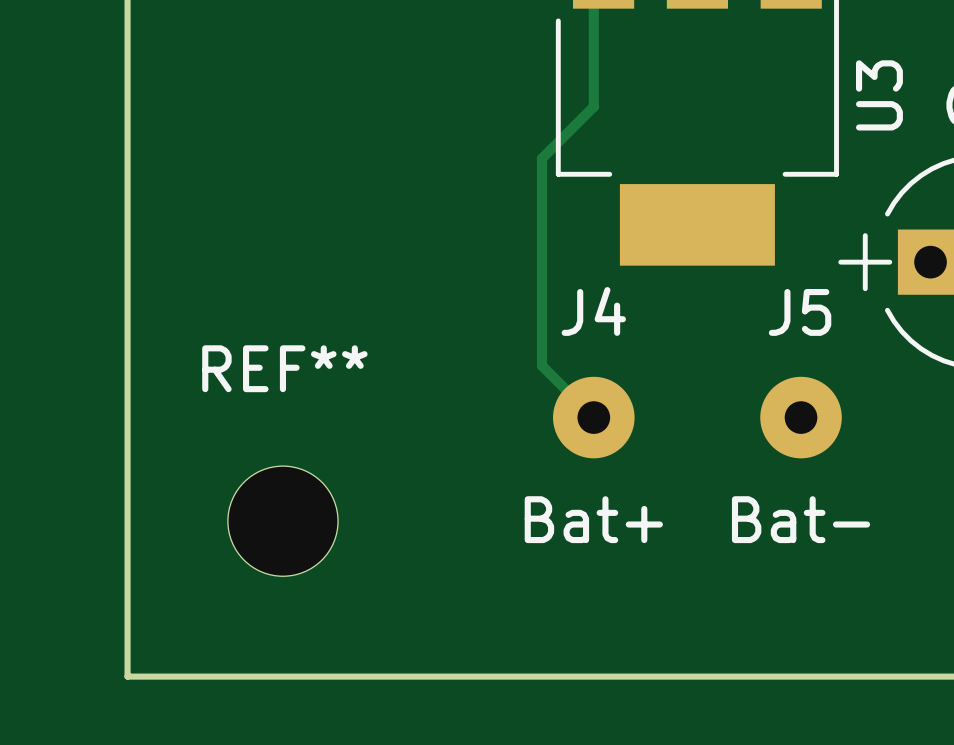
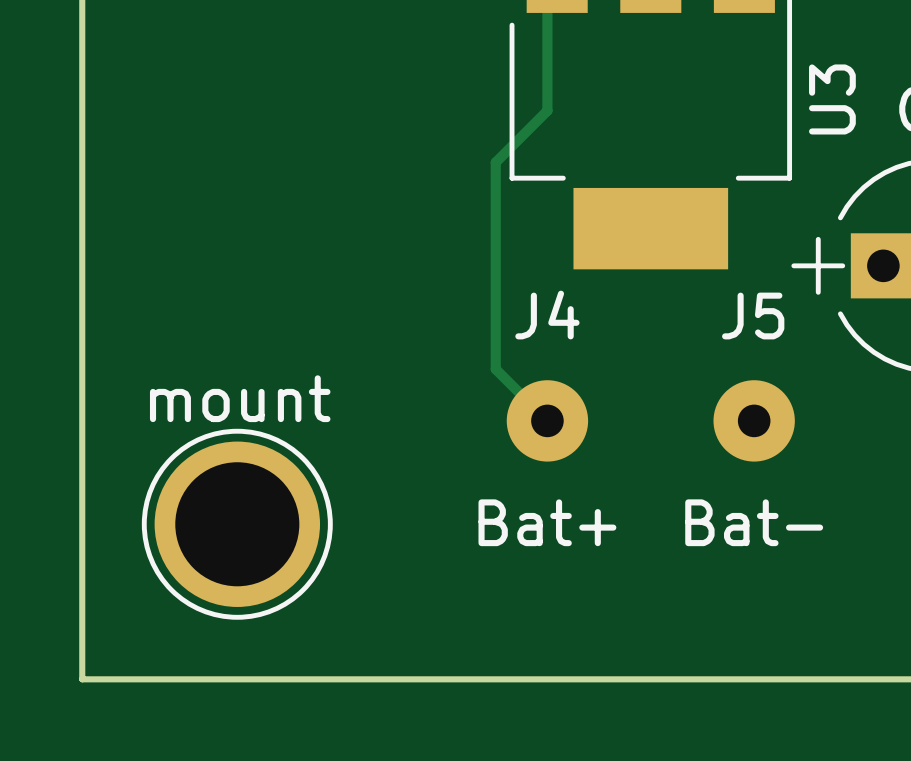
REF**: (282, 521) -> none
mount: none -> (237, 524)

